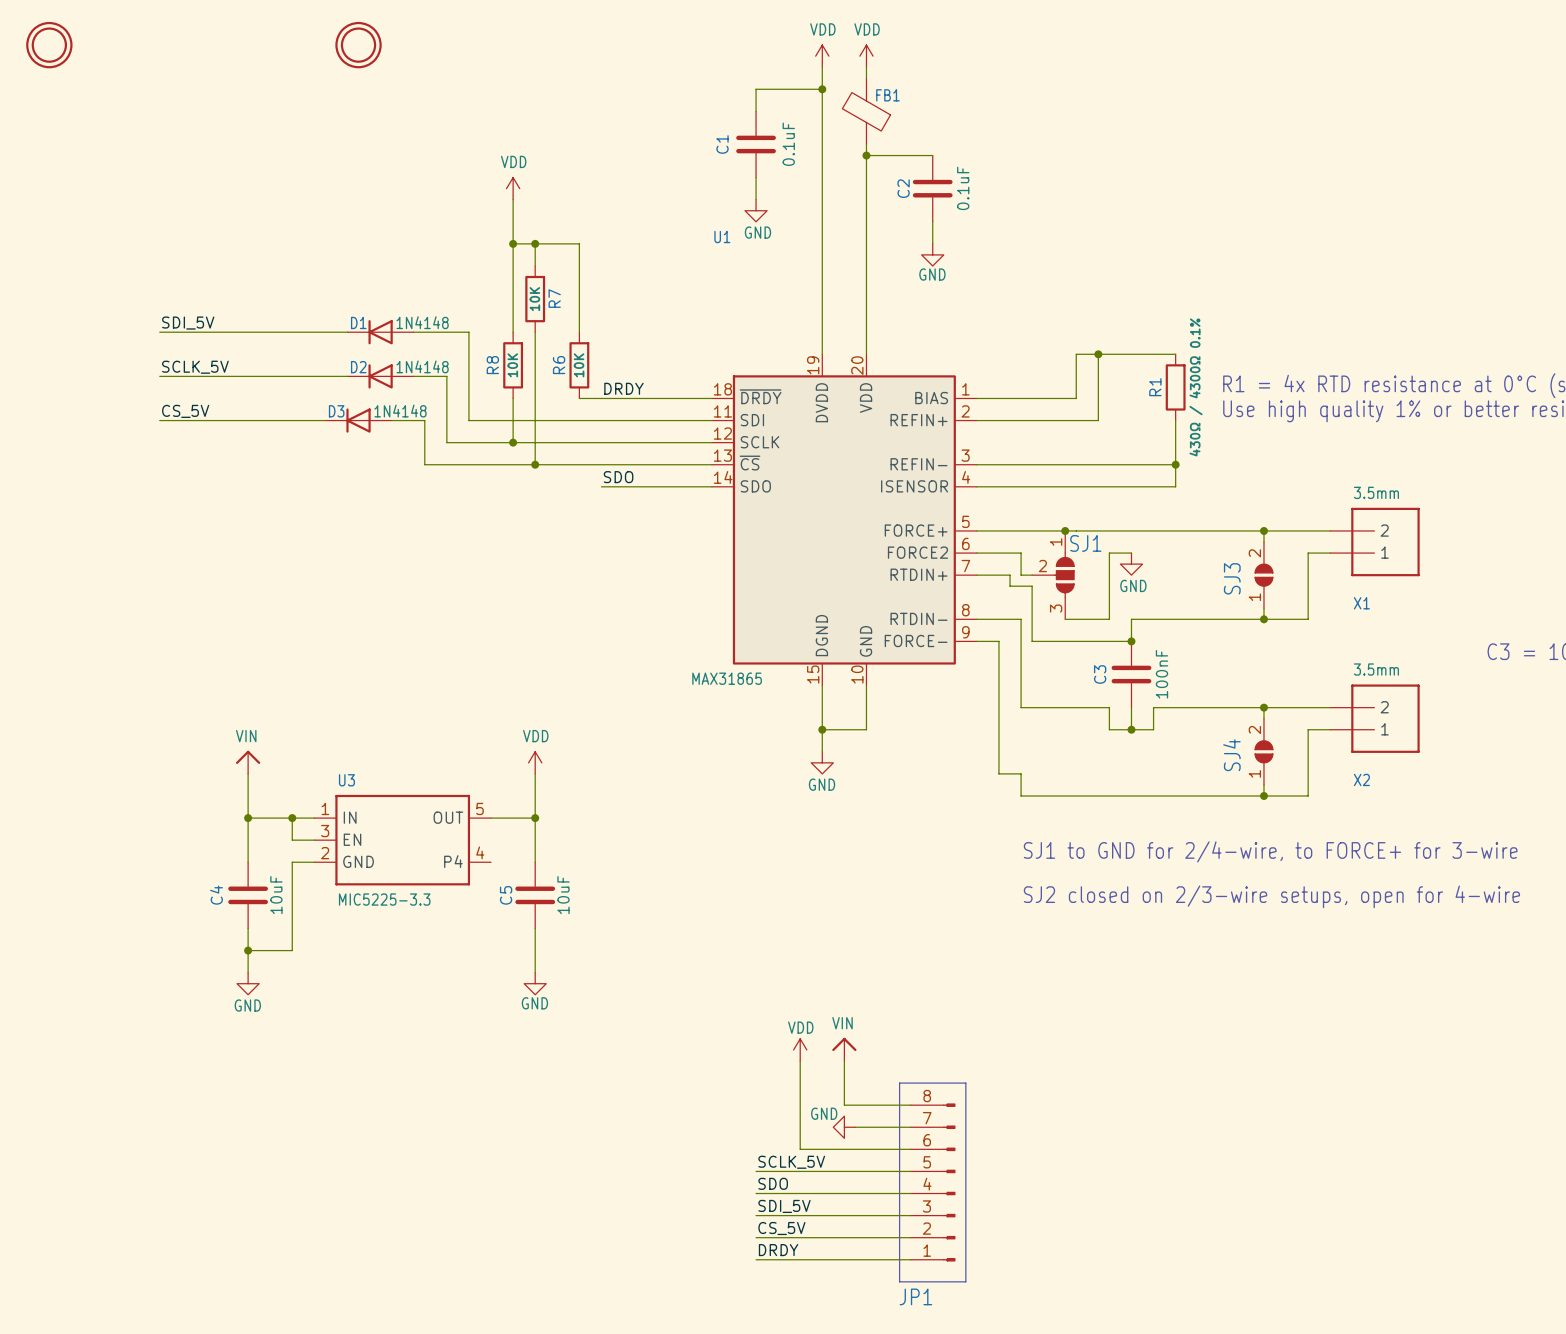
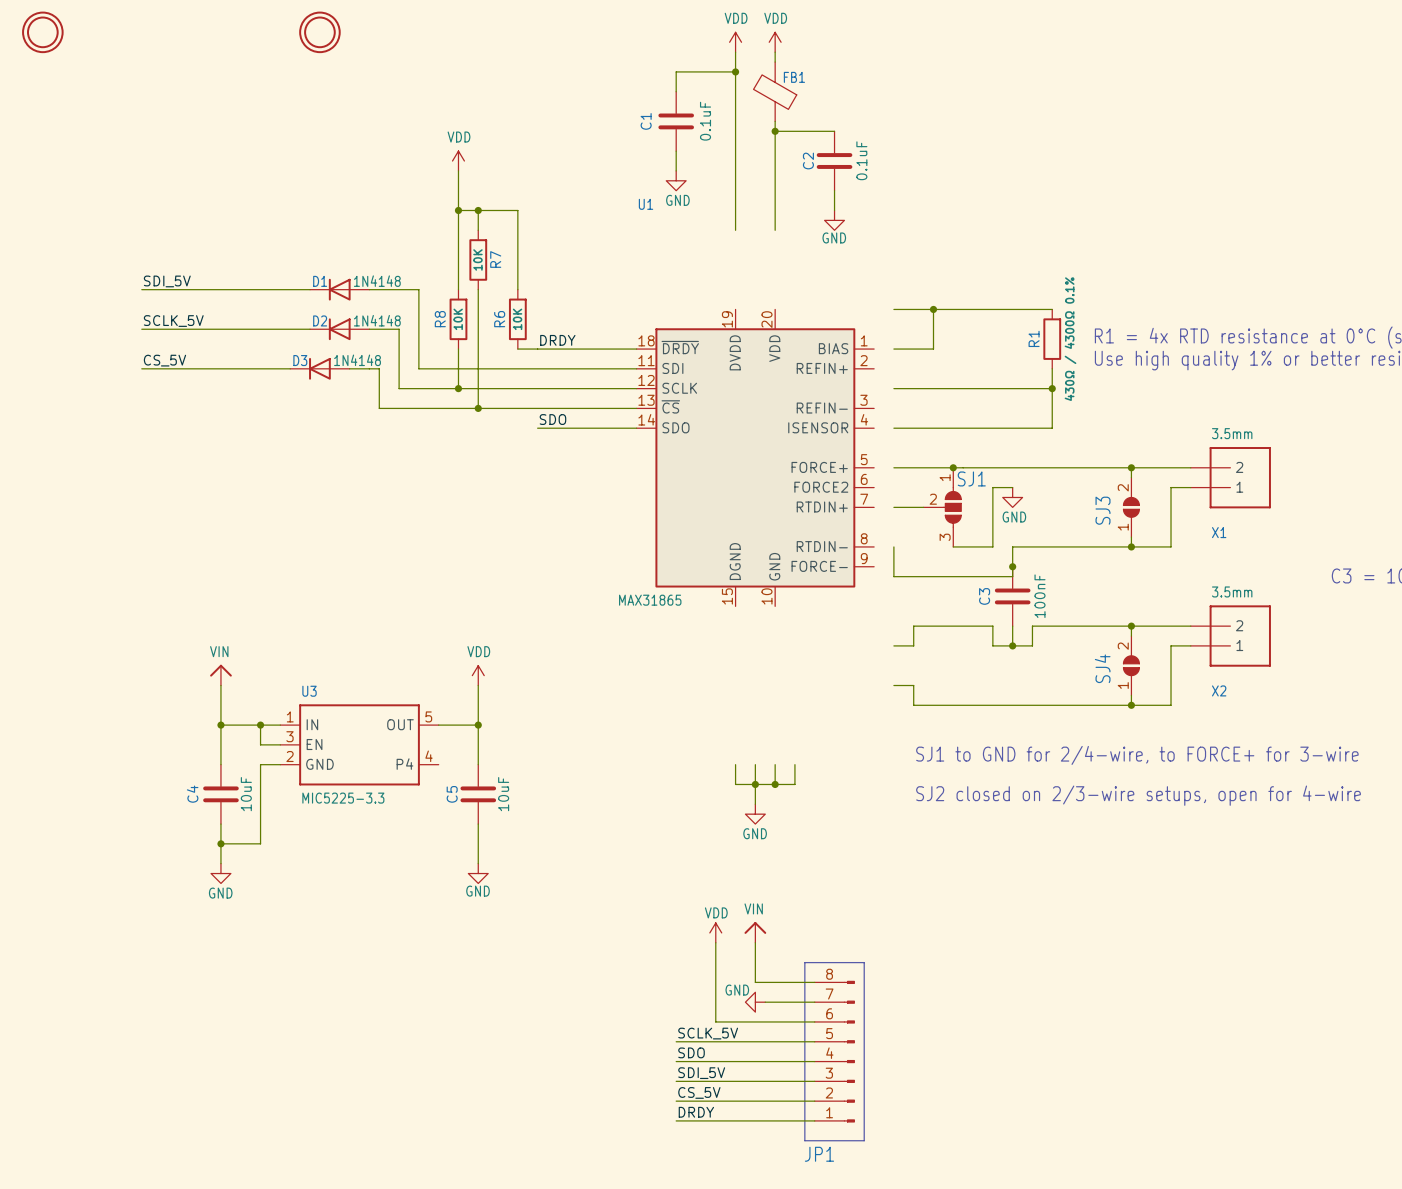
wire: (822, 265) (822, 354) -> none
wire: (866, 265) (866, 354) -> none
wire: none -> (893, 309) (963, 309)
junction: none -> (933, 309)
wire: (1076, 354) (1076, 398) (1043, 398) -> (933, 309) (933, 349)
wire: (1098, 354) (1098, 420) (976, 420) -> none
junction: (1098, 354) -> none
wire: (976, 398) (998, 398) -> none
wire: none -> (893, 388) (1052, 388)
wire: (976, 464) (1175, 464) -> none
junction position: (1175, 464) -> (1052, 388)
wire: (976, 486) (998, 486) -> none
wire: (976, 530) (998, 530) -> none
wire: (976, 553) (1021, 553) (1021, 575) -> (903, 507) (913, 507)
wire: (976, 575) (998, 575) -> none
wire: (1010, 575) (1010, 586) (1032, 586) (1032, 641) (1131, 641) -> (893, 576) (1012, 576) (1012, 566)
wire: (976, 619) (1021, 619) (1021, 707) -> (893, 645) (913, 645) (913, 626)
wire: (976, 641) (998, 641) -> (893, 546) (893, 566)
wire: (998, 652) (998, 773) -> none
wire: (822, 685) (822, 751) -> none
wire: (866, 685) (866, 729) (822, 729) -> none
junction: (822, 729) -> none
power symbol position: GND (822, 762) -> GND (755, 814)
wire: none -> (735, 764) (735, 784) (794, 784) (794, 764)
wire: none -> (755, 764) (755, 804)
wire: none -> (775, 764) (775, 784)
junction: none -> (755, 784)
junction: none -> (775, 784)

